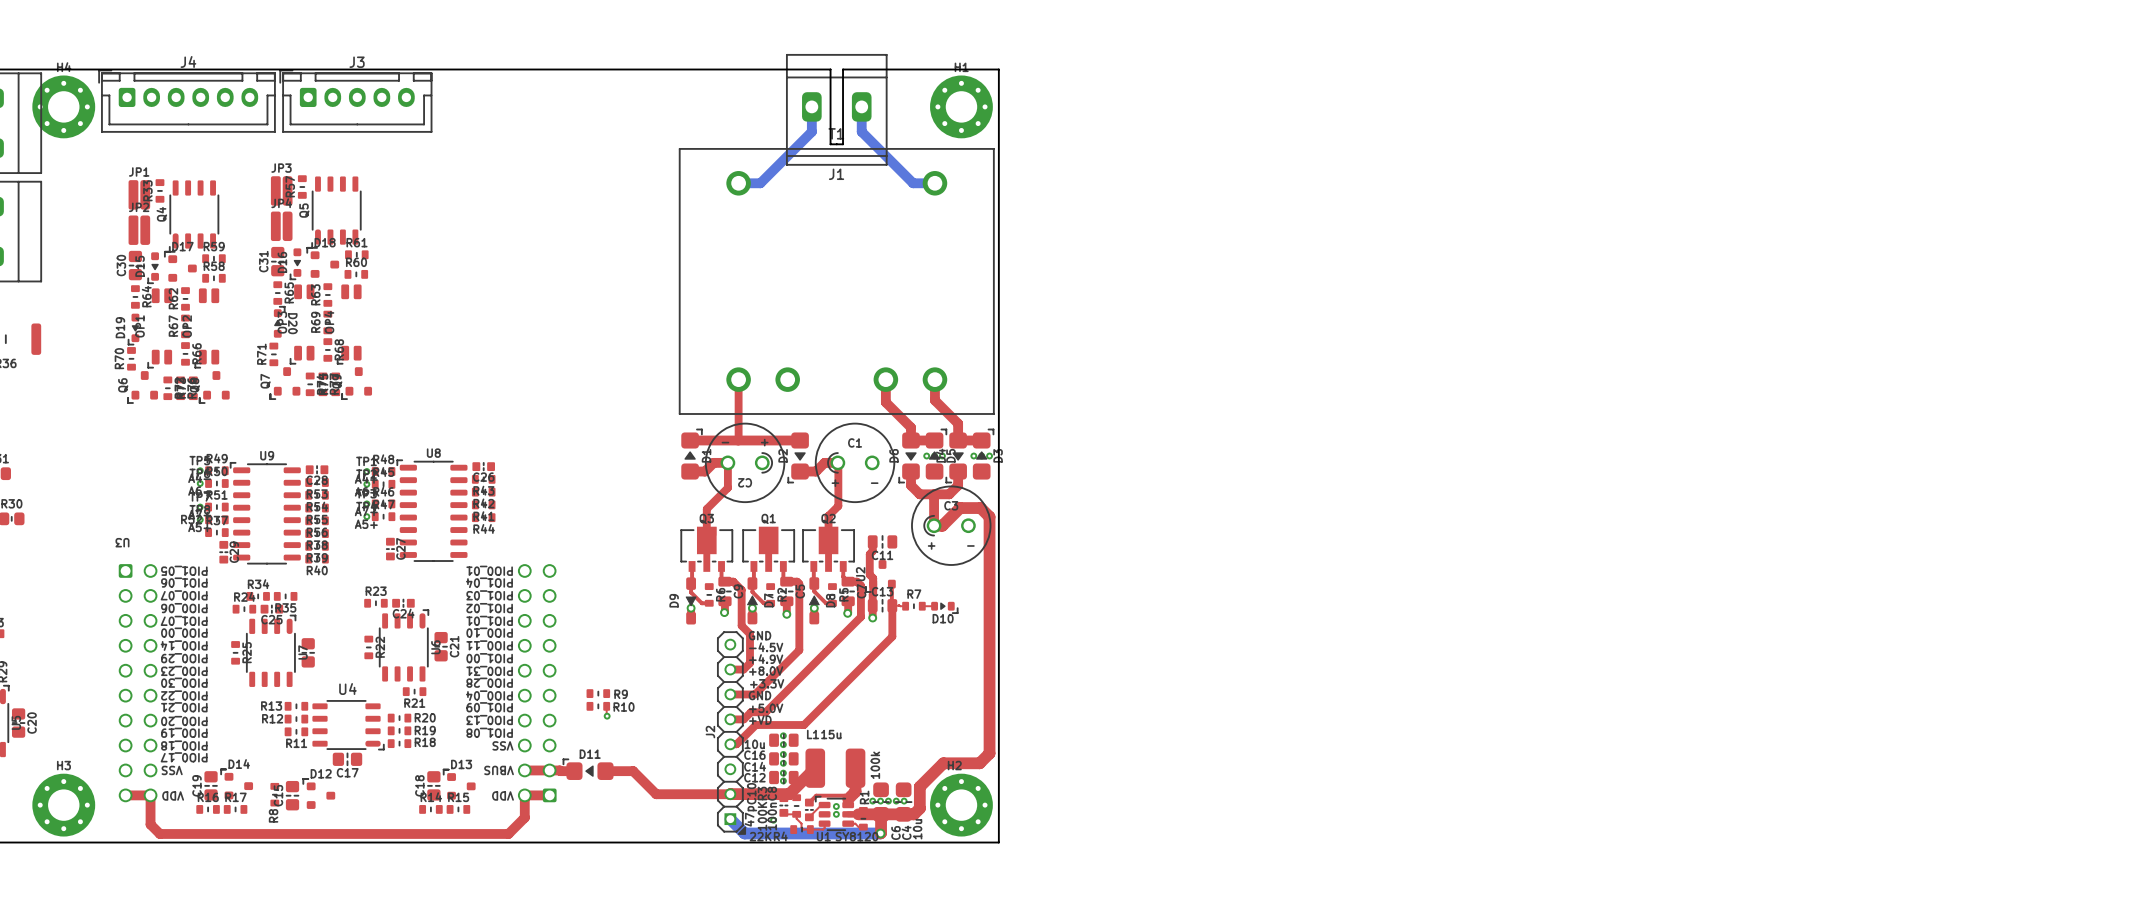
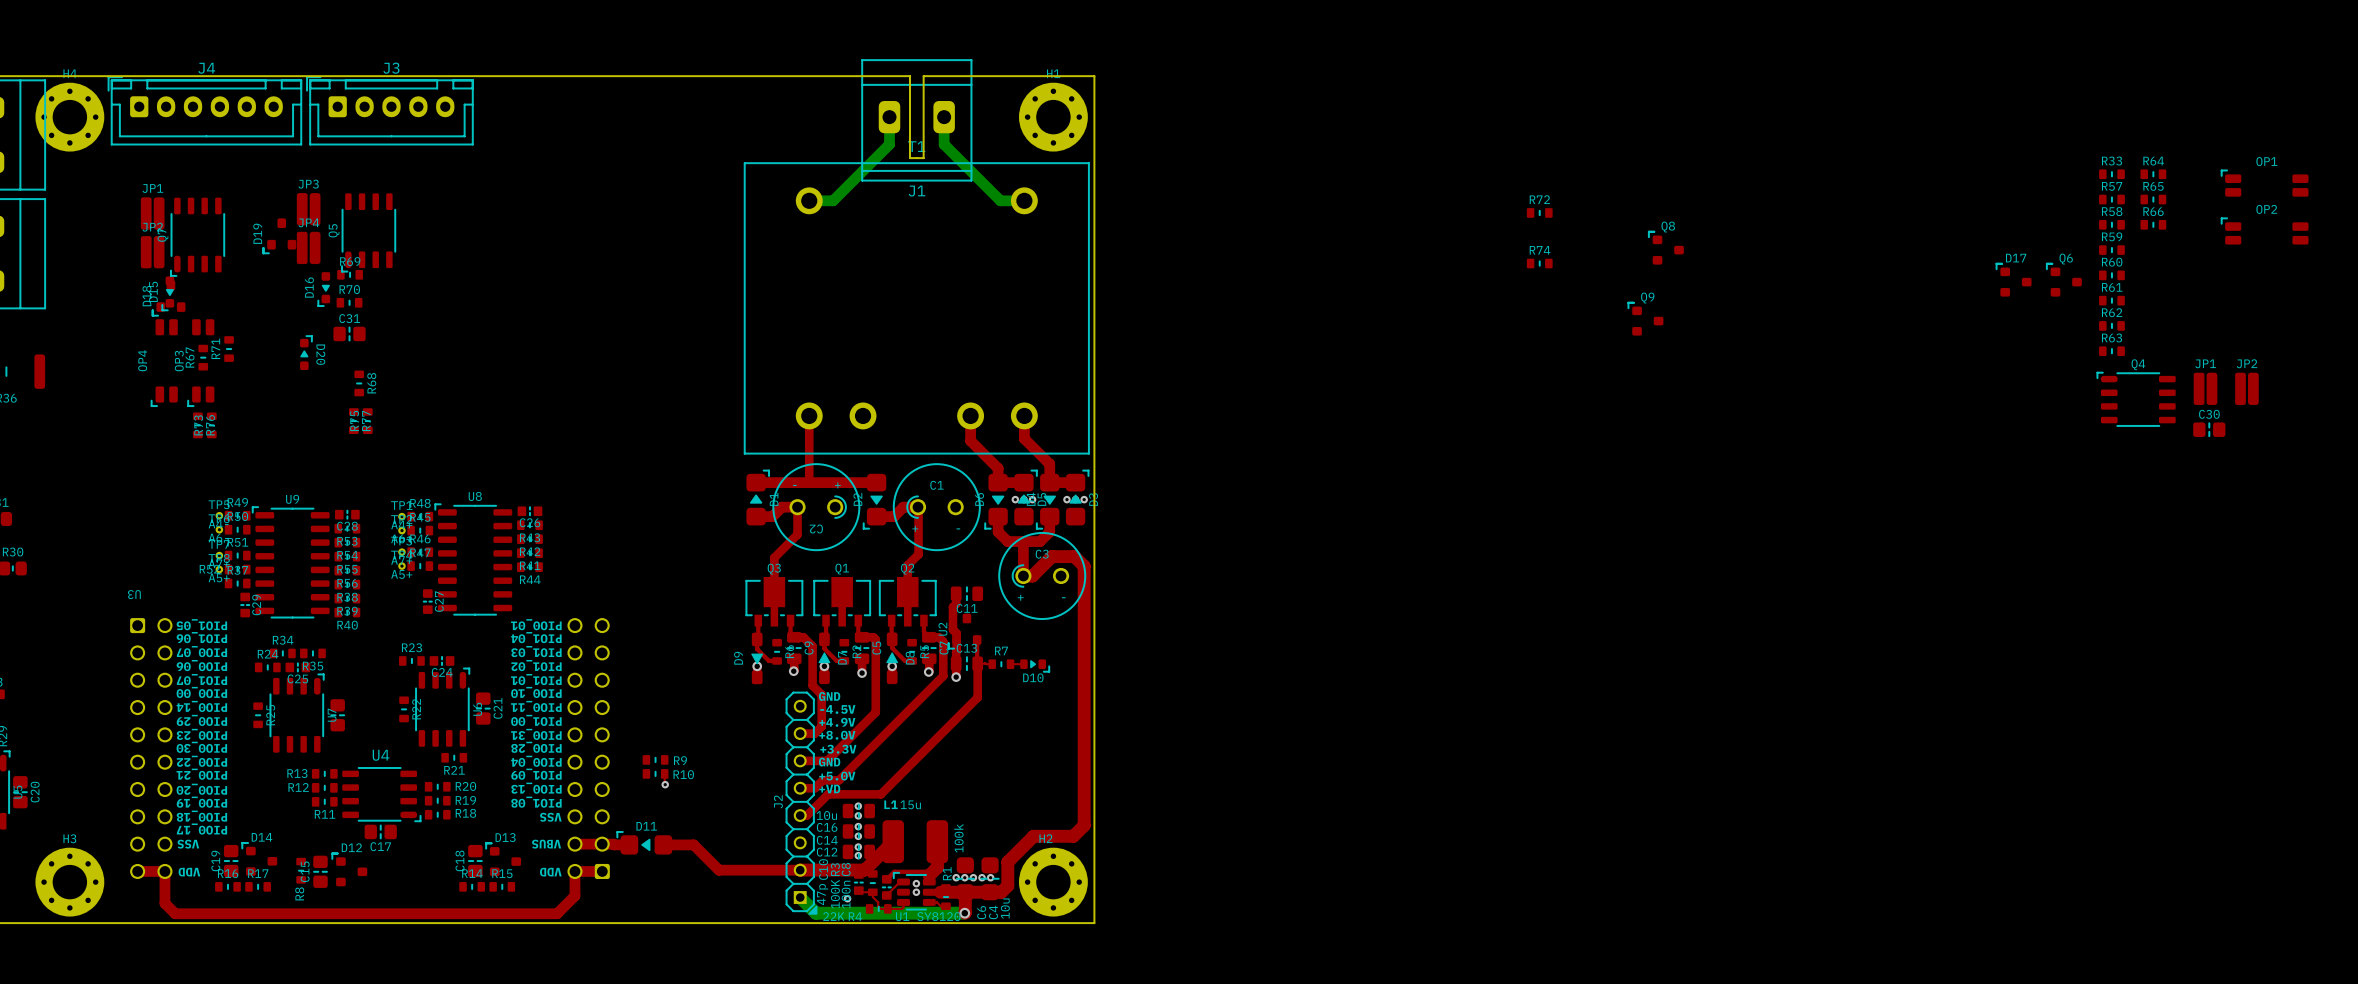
R57 rotation: 0° (302, 187) -> 90° clockwise (2111, 199)
R57 position: (302, 187) -> (2111, 199)
R33 rotation: 0° (159, 190) -> 90° clockwise (2111, 174)
R33 position: (159, 190) -> (2111, 174)
Q4 rotation: 0° (194, 216) -> 90° clockwise (2136, 399)
Q4 position: (194, 216) -> (2136, 399)
R61 position: (356, 254) -> (2111, 300)
R59 position: (213, 258) -> (2111, 250)
C31 rotation: 0° (277, 261) -> 90° clockwise (349, 333)
C31 position: (277, 261) -> (349, 333)
D18 rotation: 0° (322, 262) -> 90° counterclockwise (168, 298)
D18 position: (322, 262) -> (168, 298)
C30 rotation: 0° (135, 265) -> 90° clockwise (2209, 429)
C30 position: (135, 265) -> (2209, 429)
D17 position: (180, 266) -> (2013, 279)
R60 position: (356, 274) -> (2111, 275)
R58 position: (213, 278) -> (2111, 224)
R65 rotation: 0° (277, 293) -> 90° clockwise (2153, 199)
R65 position: (277, 293) -> (2153, 199)
R63 rotation: 0° (327, 295) -> 90° clockwise (2111, 351)
R63 position: (327, 295) -> (2111, 351)
R64 rotation: 0° (135, 296) -> 90° clockwise (2153, 174)
R64 position: (135, 296) -> (2153, 174)
R62 rotation: 0° (185, 298) -> 90° clockwise (2111, 325)
R62 position: (185, 298) -> (2111, 325)
D19 footprint: [127, 313, 140, 346] -> [262, 218, 297, 254]
R69 rotation: 0° (327, 322) -> 90° clockwise (350, 274)
R69 position: (327, 322) -> (350, 274)
OP3 position: (302, 324) -> (200, 363)
OP4 position: (349, 324) -> (164, 363)
OP1 rotation: 0° (159, 328) -> 90° clockwise (2264, 183)
OP1 position: (159, 328) -> (2264, 183)
OP2 rotation: 0° (206, 328) -> 90° clockwise (2264, 231)
OP2 position: (206, 328) -> (2264, 231)
R66 rotation: 0° (185, 353) -> 90° clockwise (2153, 224)
R66 position: (185, 353) -> (2153, 224)
R71 position: (273, 354) -> (229, 349)
JP1: none -> (2205, 388)
JP2: none -> (2246, 388)
R70 rotation: 0° (131, 358) -> 90° clockwise (349, 302)
R70 position: (131, 358) -> (349, 302)
Q7 footprint: [269, 367, 301, 400] -> [170, 197, 225, 277]
Q9 rotation: 0° (356, 383) -> 90° clockwise (1645, 318)
Q9 position: (356, 383) -> (1645, 318)
R74 rotation: 0° (310, 384) -> 90° clockwise (1539, 263)
R74 position: (310, 384) -> (1539, 263)
Q6 rotation: 0° (142, 387) -> 90° clockwise (2064, 279)
Q6 position: (142, 387) -> (2064, 279)
Q8 rotation: 0° (214, 387) -> 90° clockwise (1666, 247)
Q8 position: (214, 387) -> (1666, 247)
R72 rotation: 0° (167, 388) -> 90° clockwise (1539, 212)
R72 position: (167, 388) -> (1539, 212)

